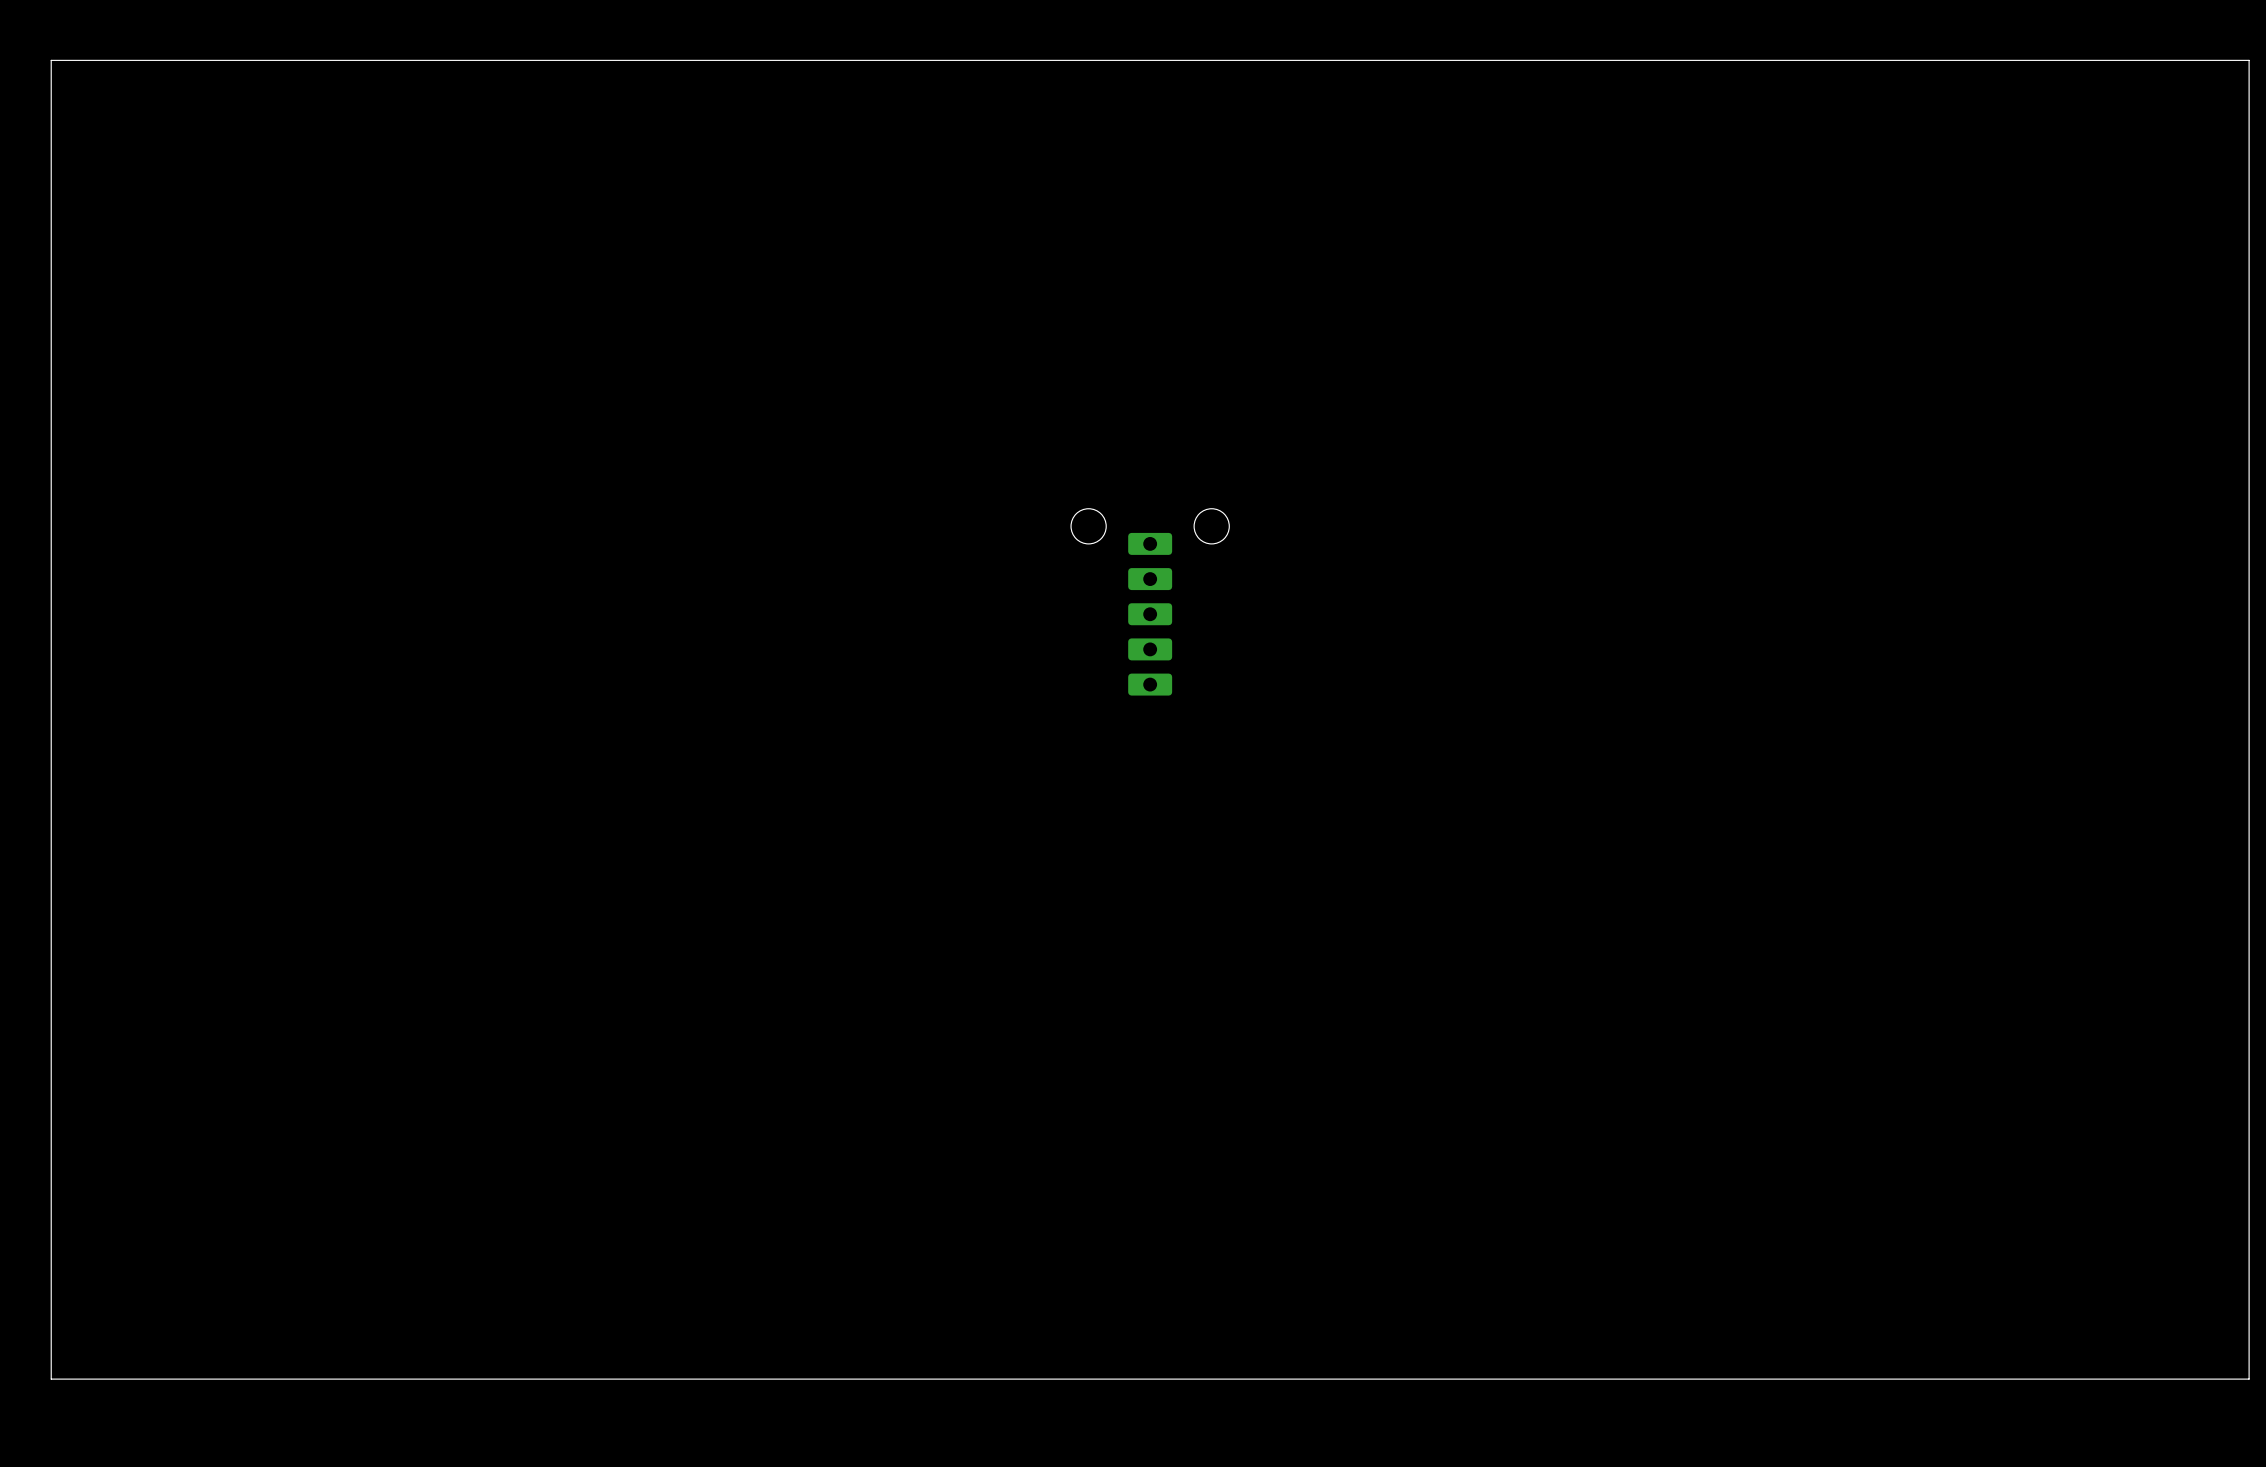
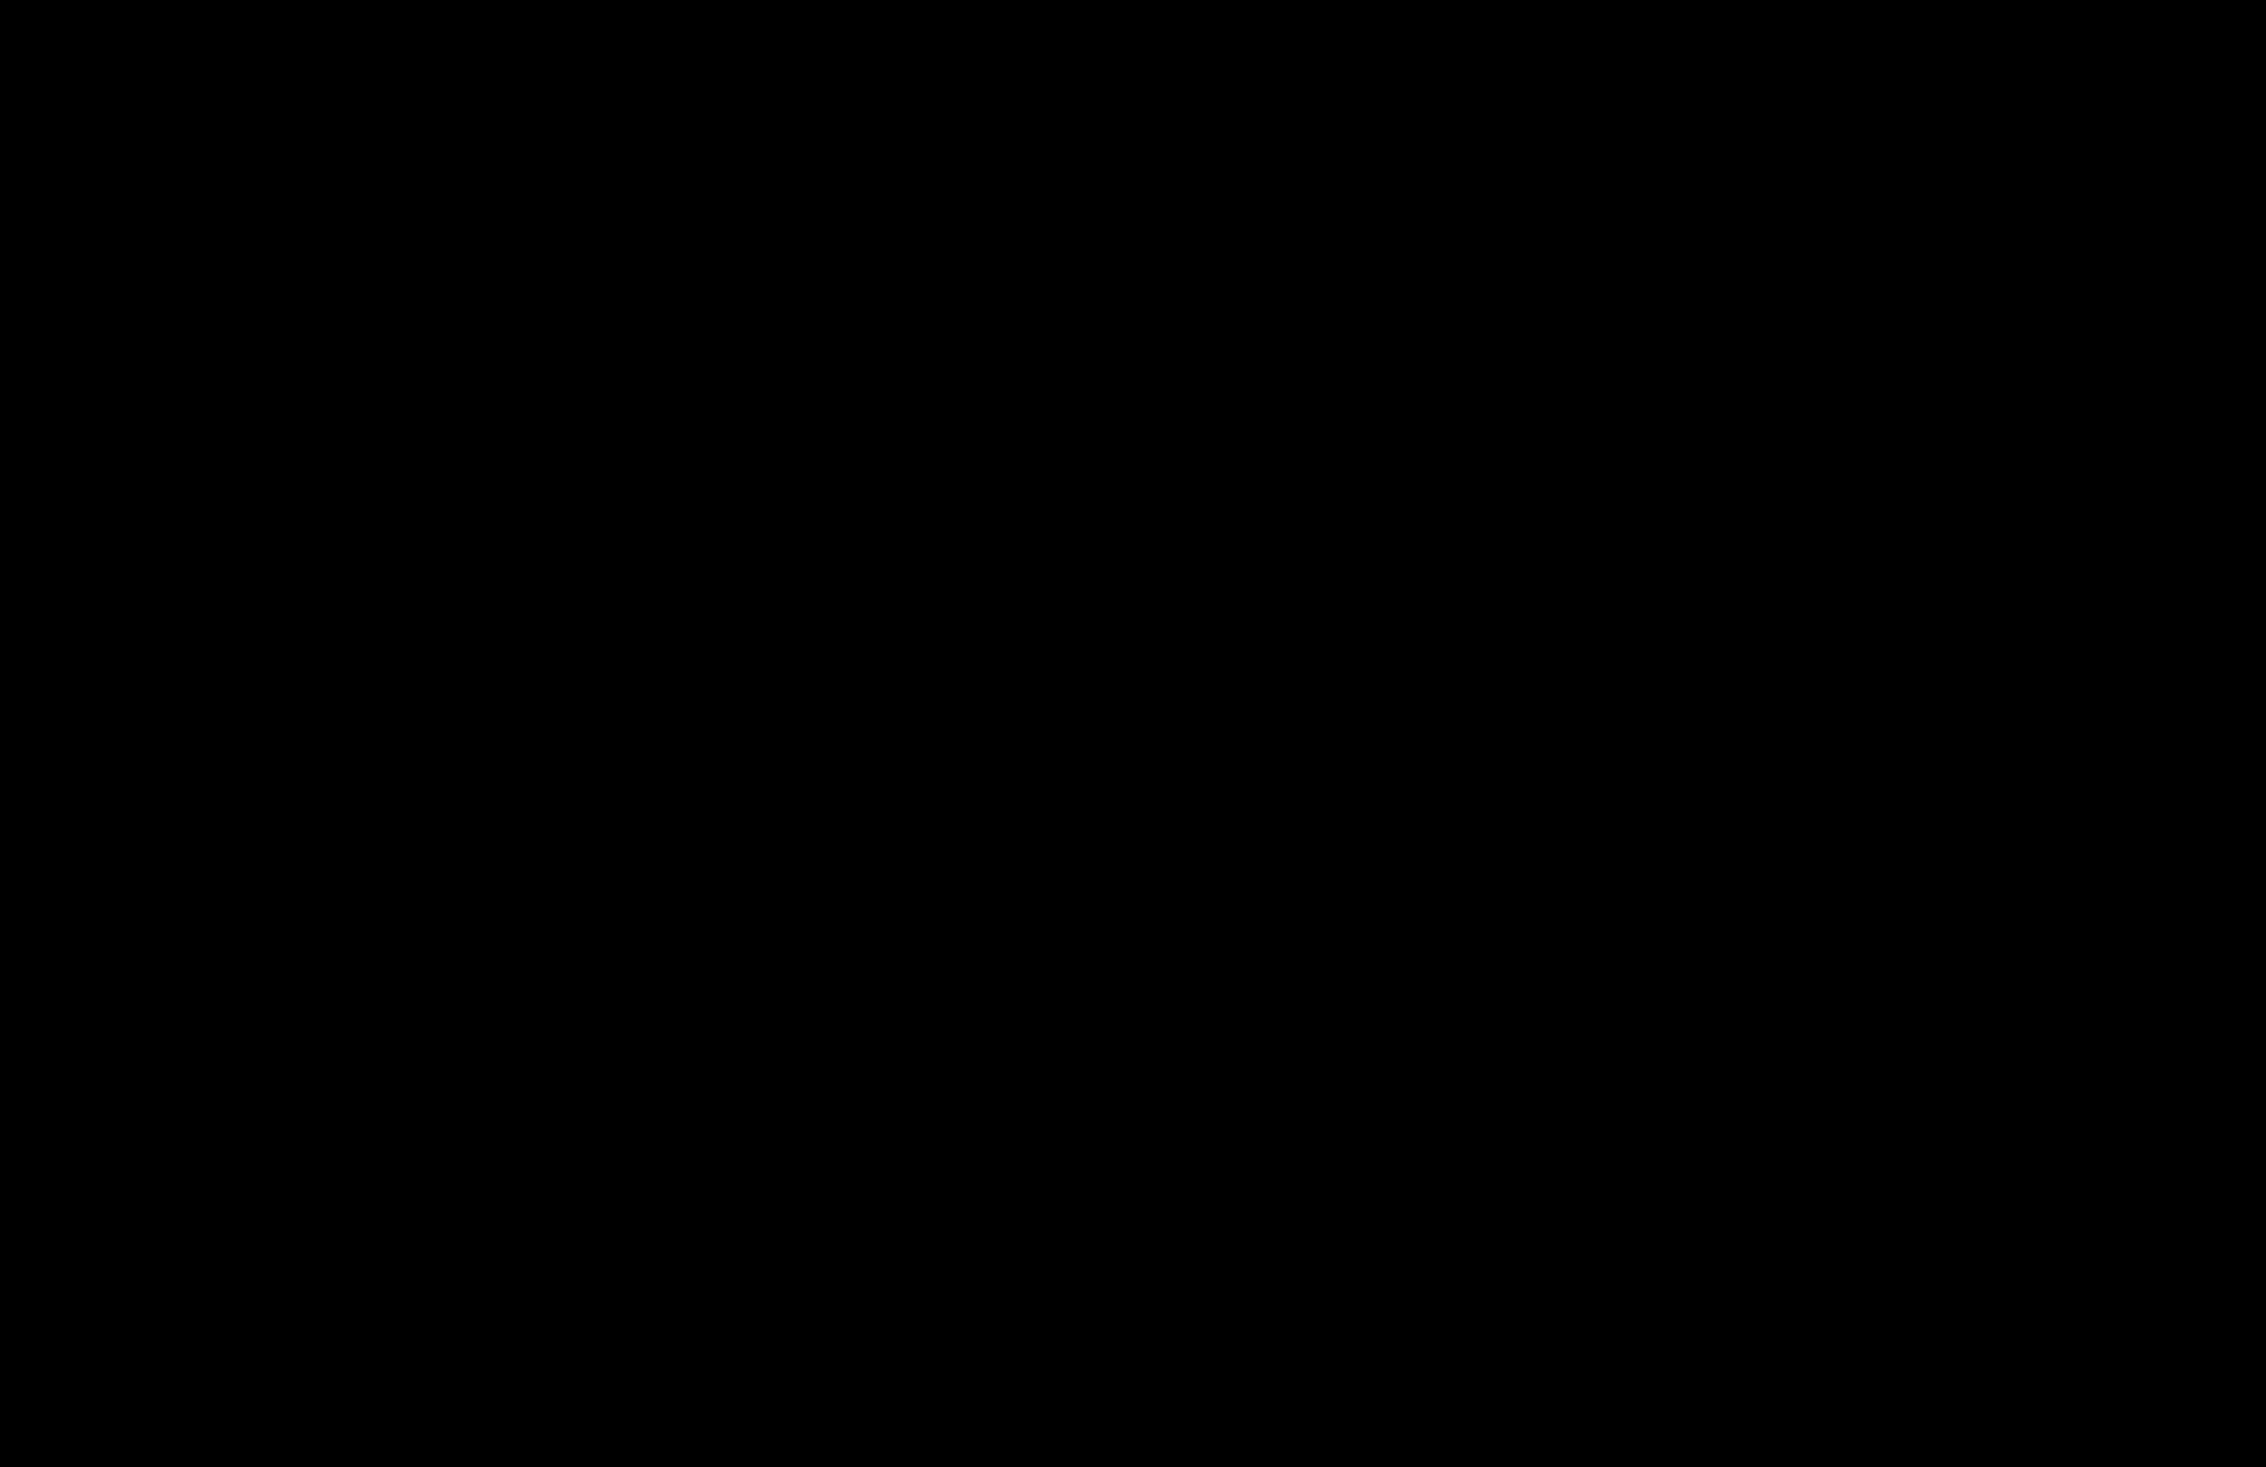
board edge: (2249, 60) (51, 60) (51, 1379) (2249, 1379) (2249, 60) -> none
part: (1150, 601) -> none

